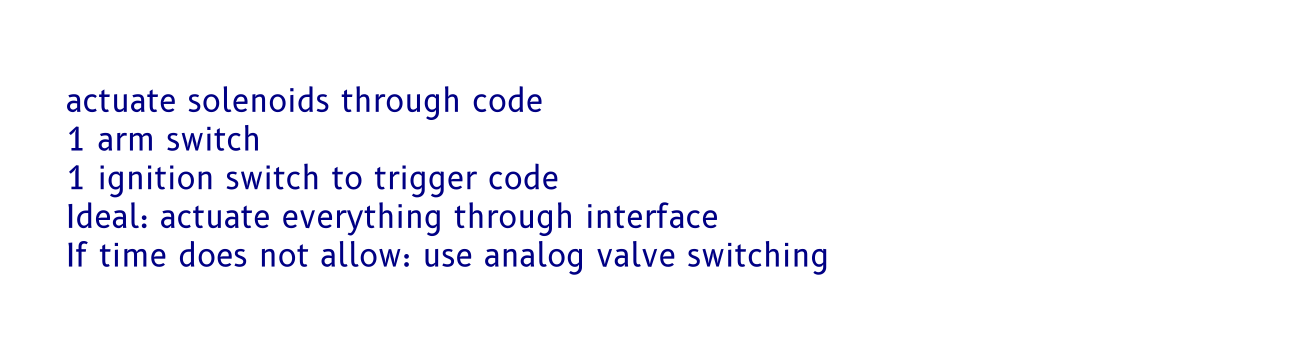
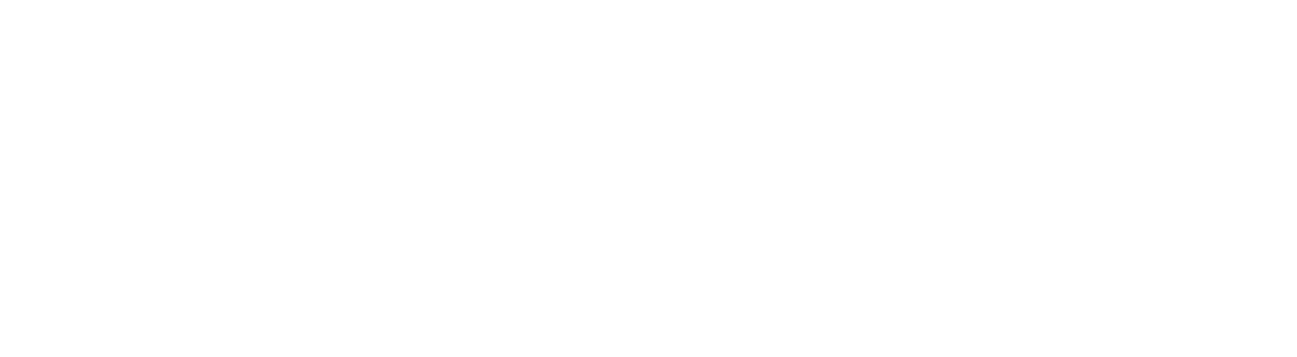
text: actuate solenoids through code (304, 103) -> none
text: 1 arm switch (163, 137) -> none
text: 1 ignition switch to trigger code (313, 180) -> none
text: Ideal: actuate everything through interface (392, 219) -> none
text: If time does not allow: use analog valve switching (447, 257) -> none

